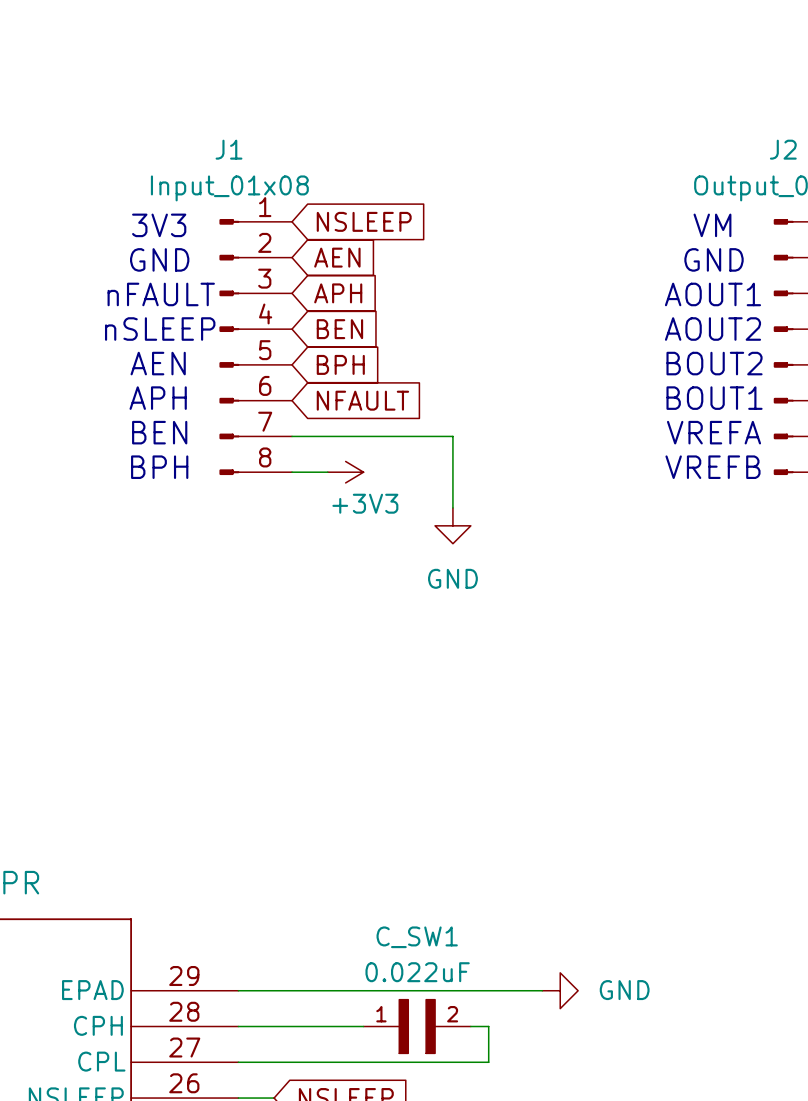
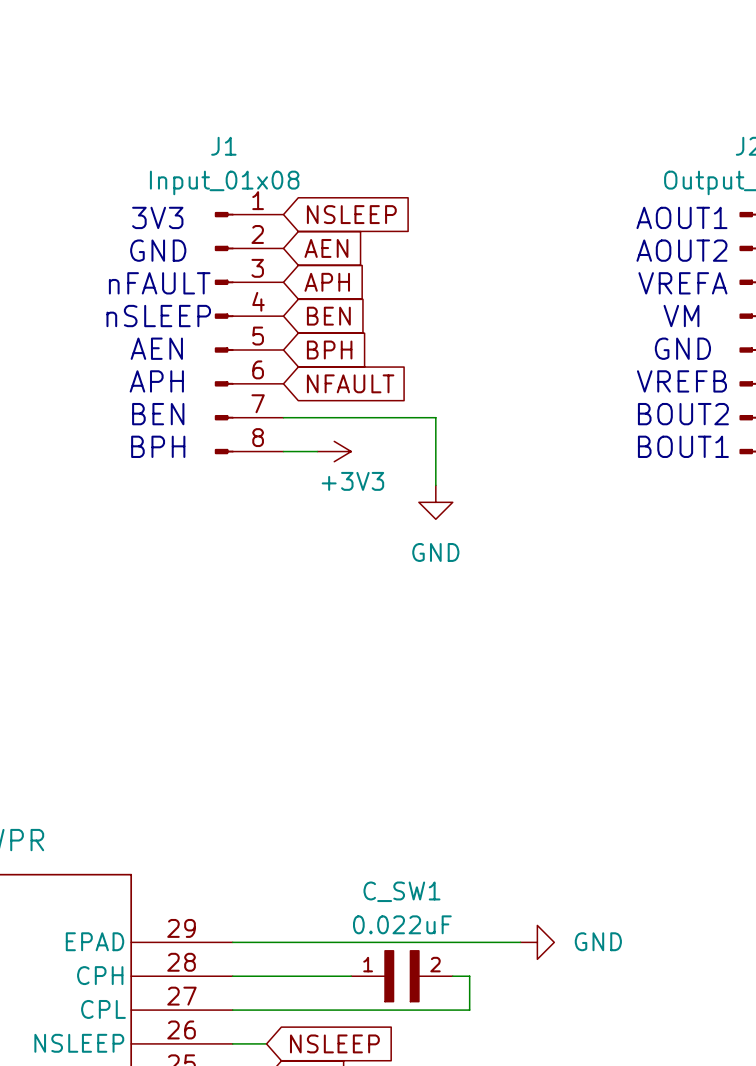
text: VM (712, 225) -> AOUT1 (681, 217)
text: GND (714, 259) -> AOUT2 (681, 250)
text: AOUT1 (712, 294) -> VREFA (682, 283)
text: AOUT2 (712, 329) -> VM (681, 316)
text: BOUT2 (714, 363) -> GND (682, 348)
text: BOUT1 (714, 398) -> VREFB (681, 381)
text: VREFA (714, 432) -> BOUT2 (683, 414)
text: VREFB (712, 467) -> BOUT1 (683, 446)

